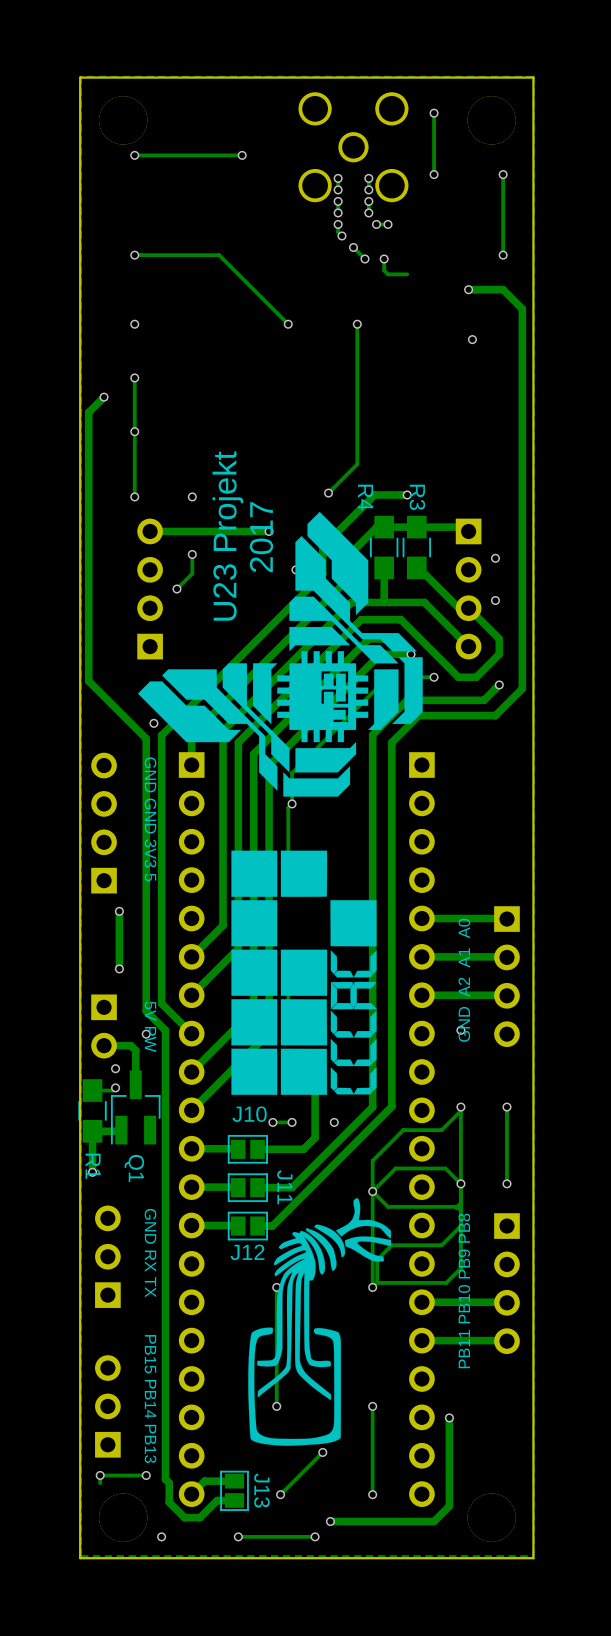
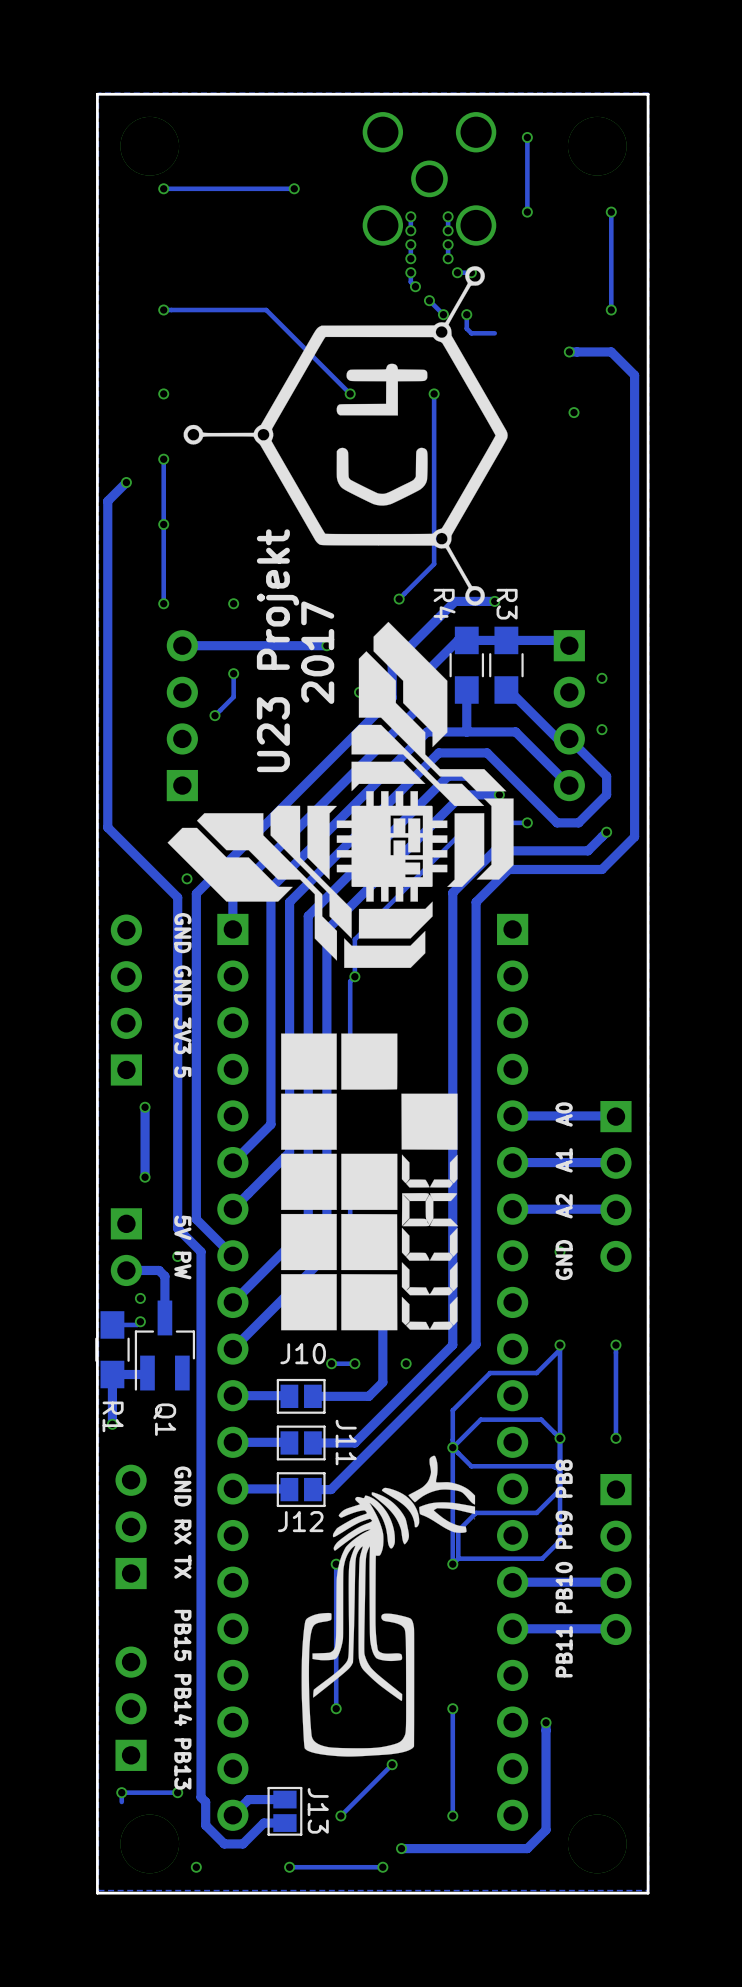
drawing: none -> [183, 266, 508, 606]

